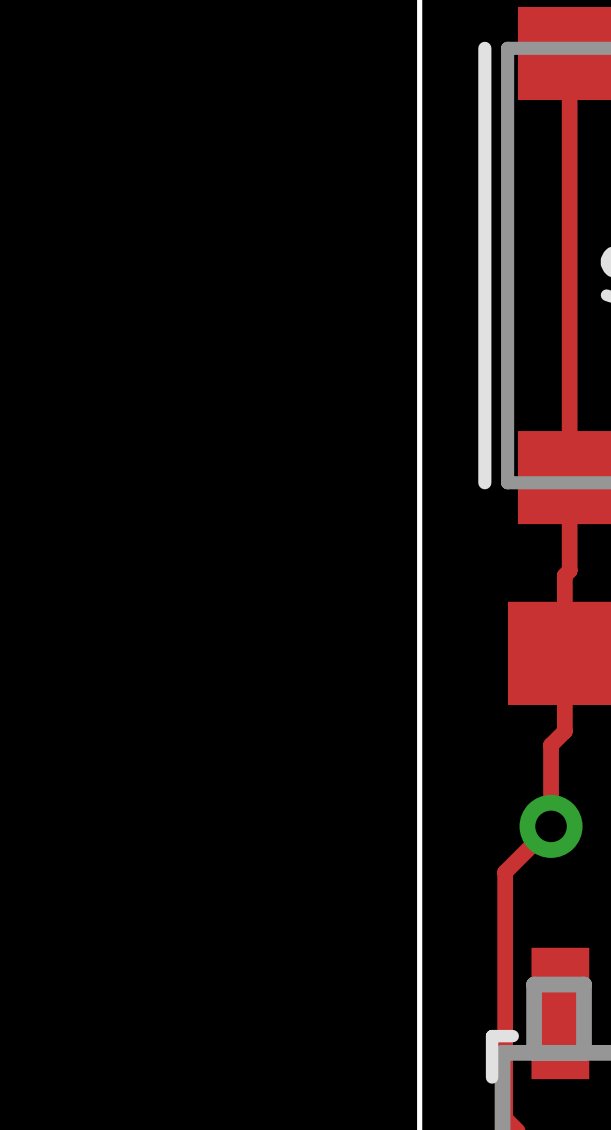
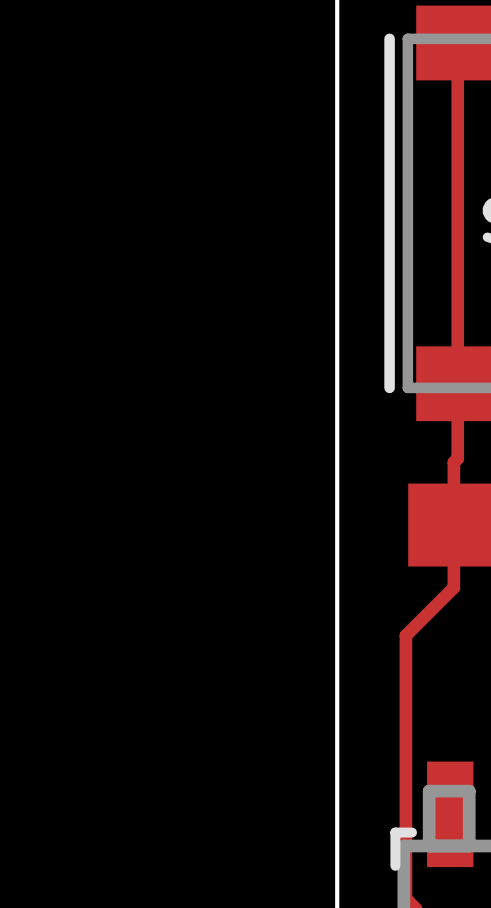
track: (551, 745) (551, 826) (505, 872) -> (442, 598) (405, 635) (405, 700)
via: (551, 826) -> none

